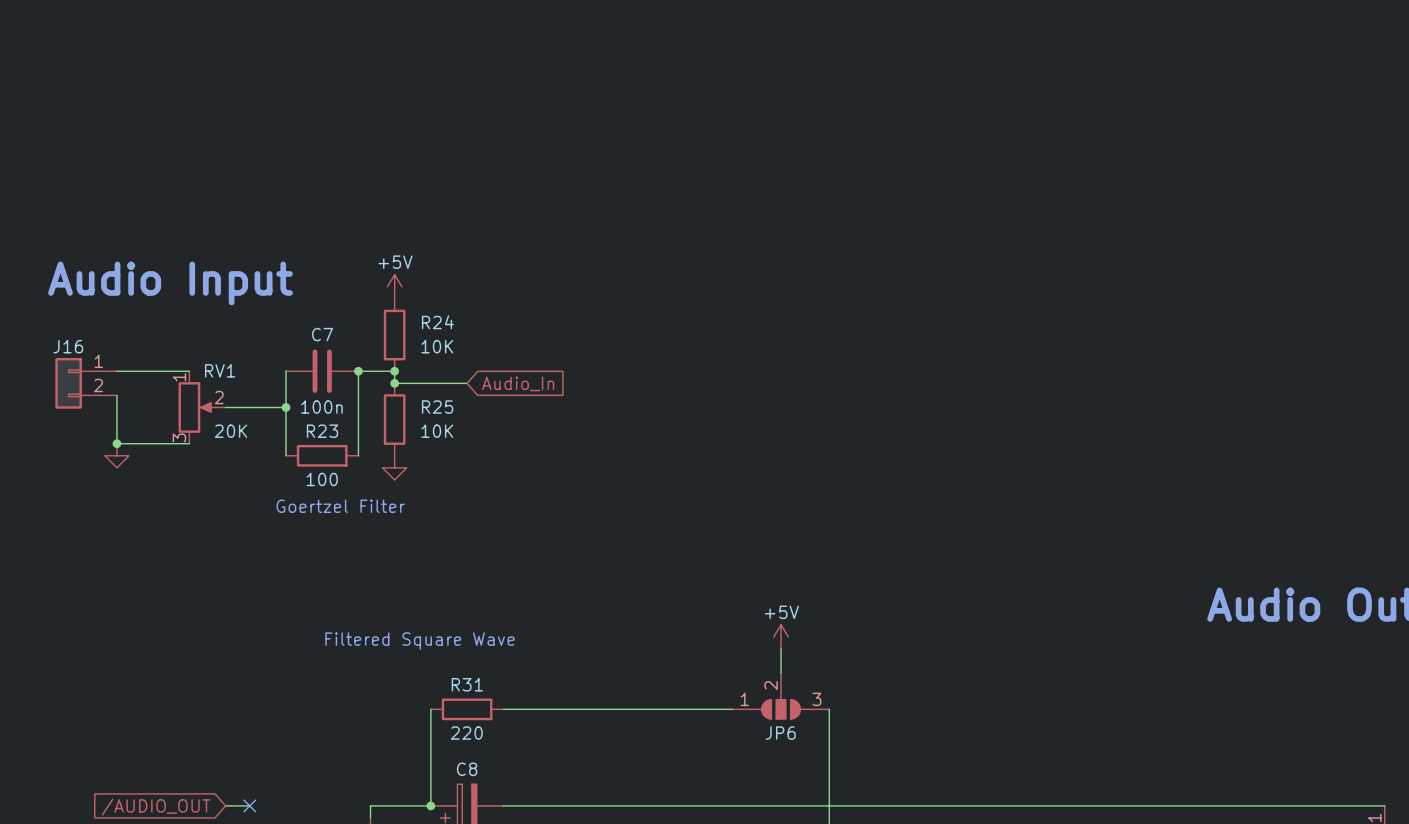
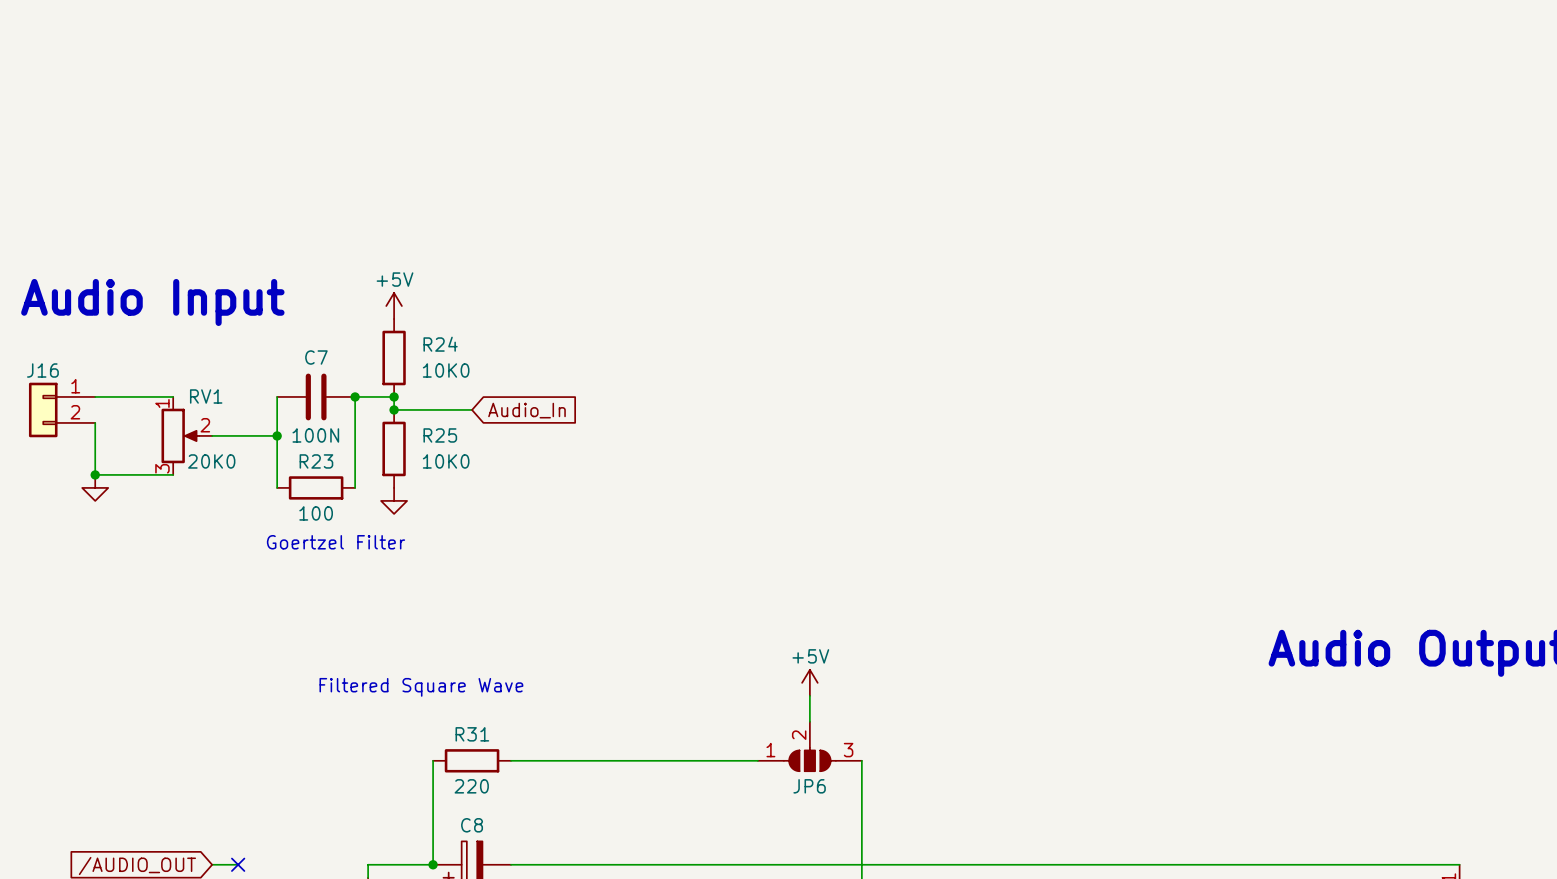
R24 value: 10K (437, 346) -> 10K0 (446, 370)
C7 value: 100n (321, 407) -> 100N (315, 435)
RV1 value: 20K (230, 431) -> 20K0 (211, 461)
R25 value: 10K (437, 431) -> 10K0 (446, 461)

